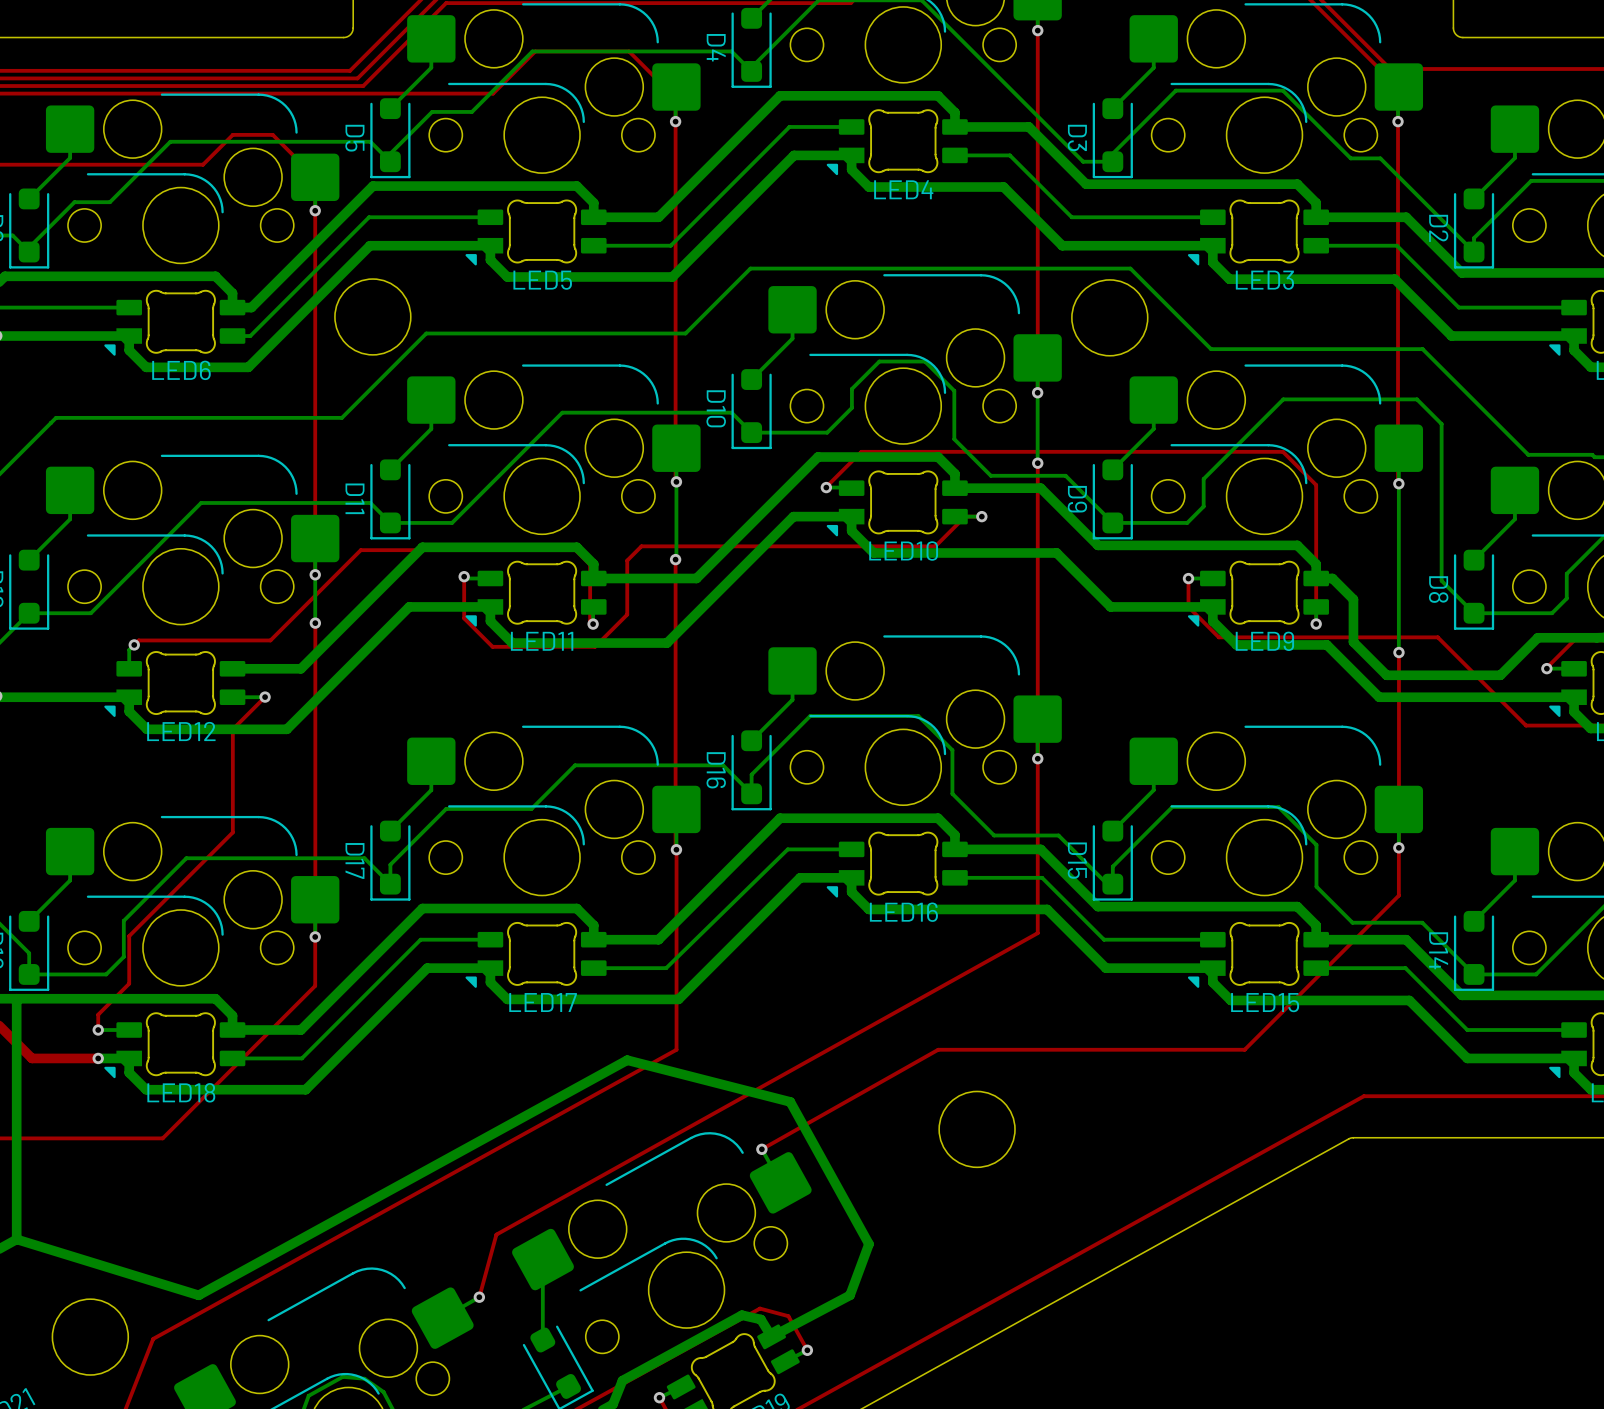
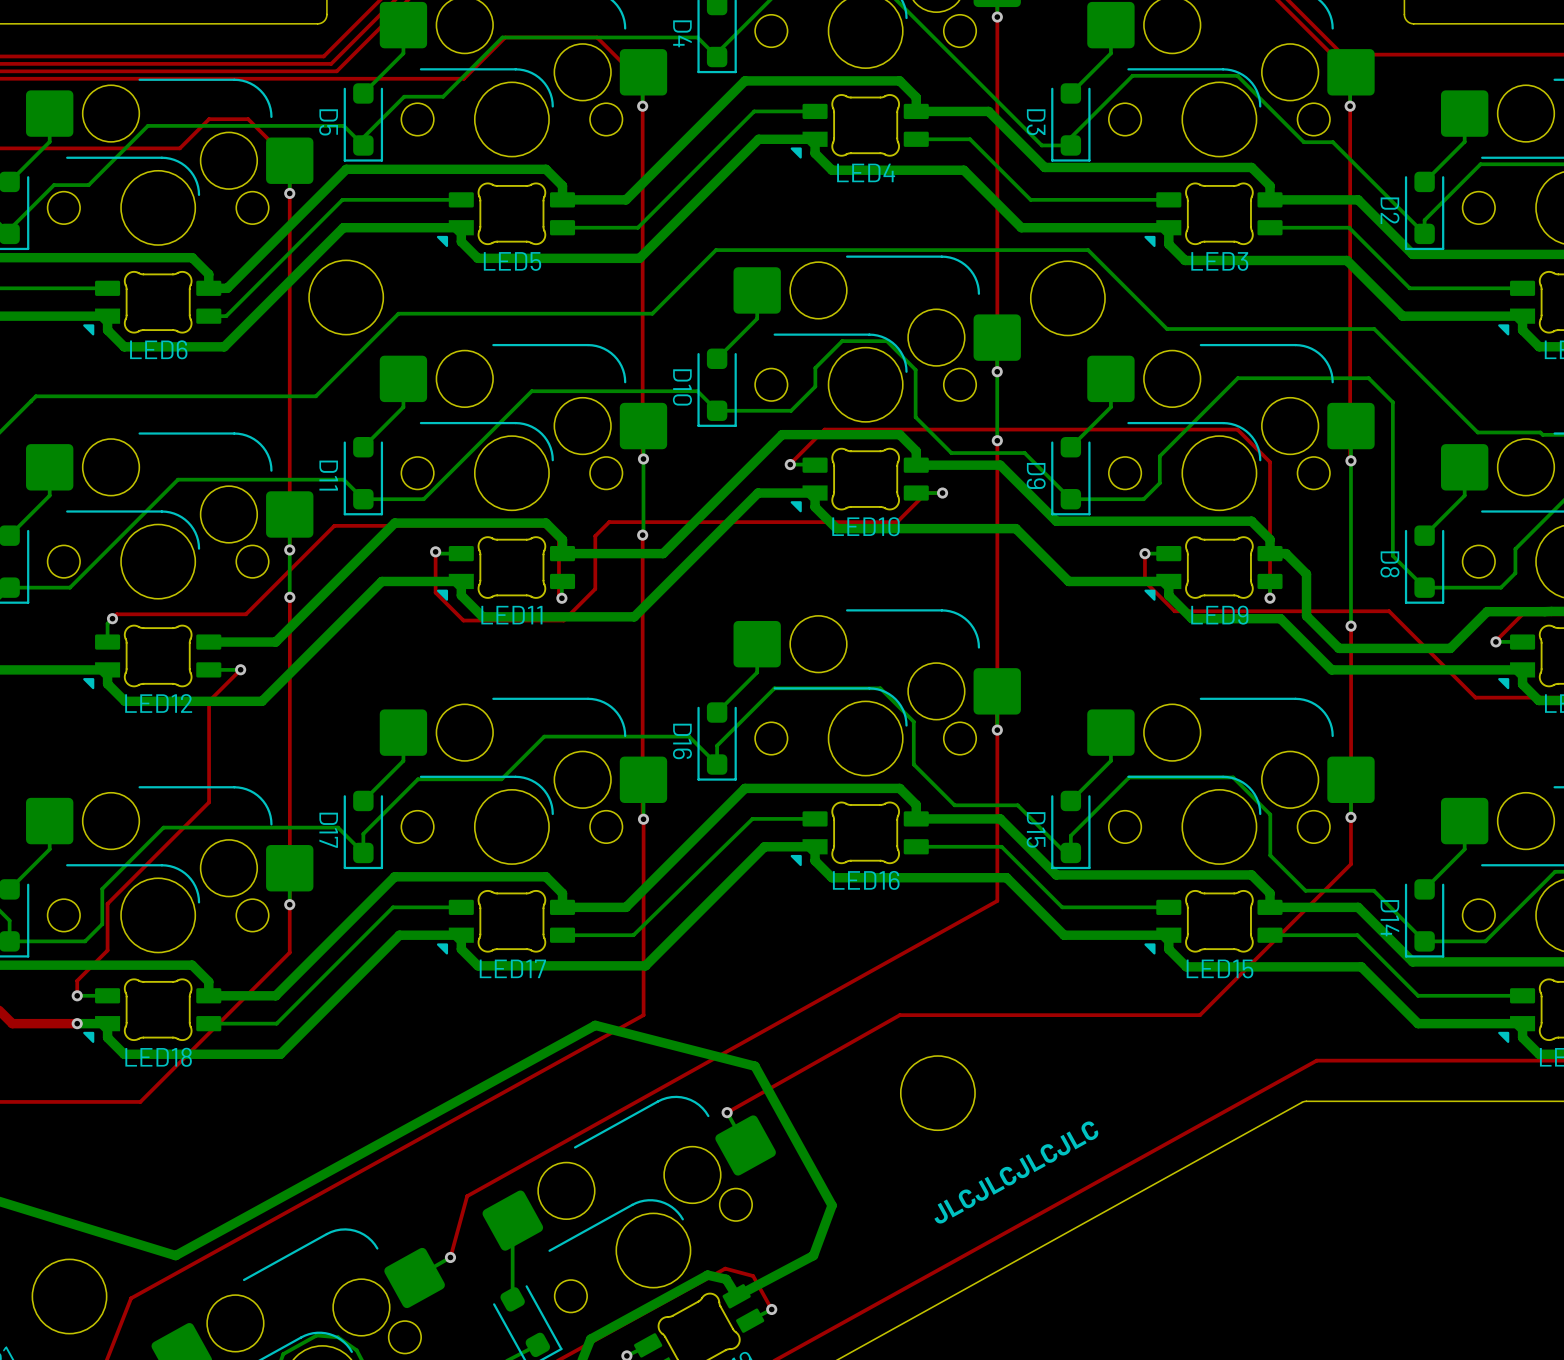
text: none -> JLCJLCJLCJLC (1016, 1172)

